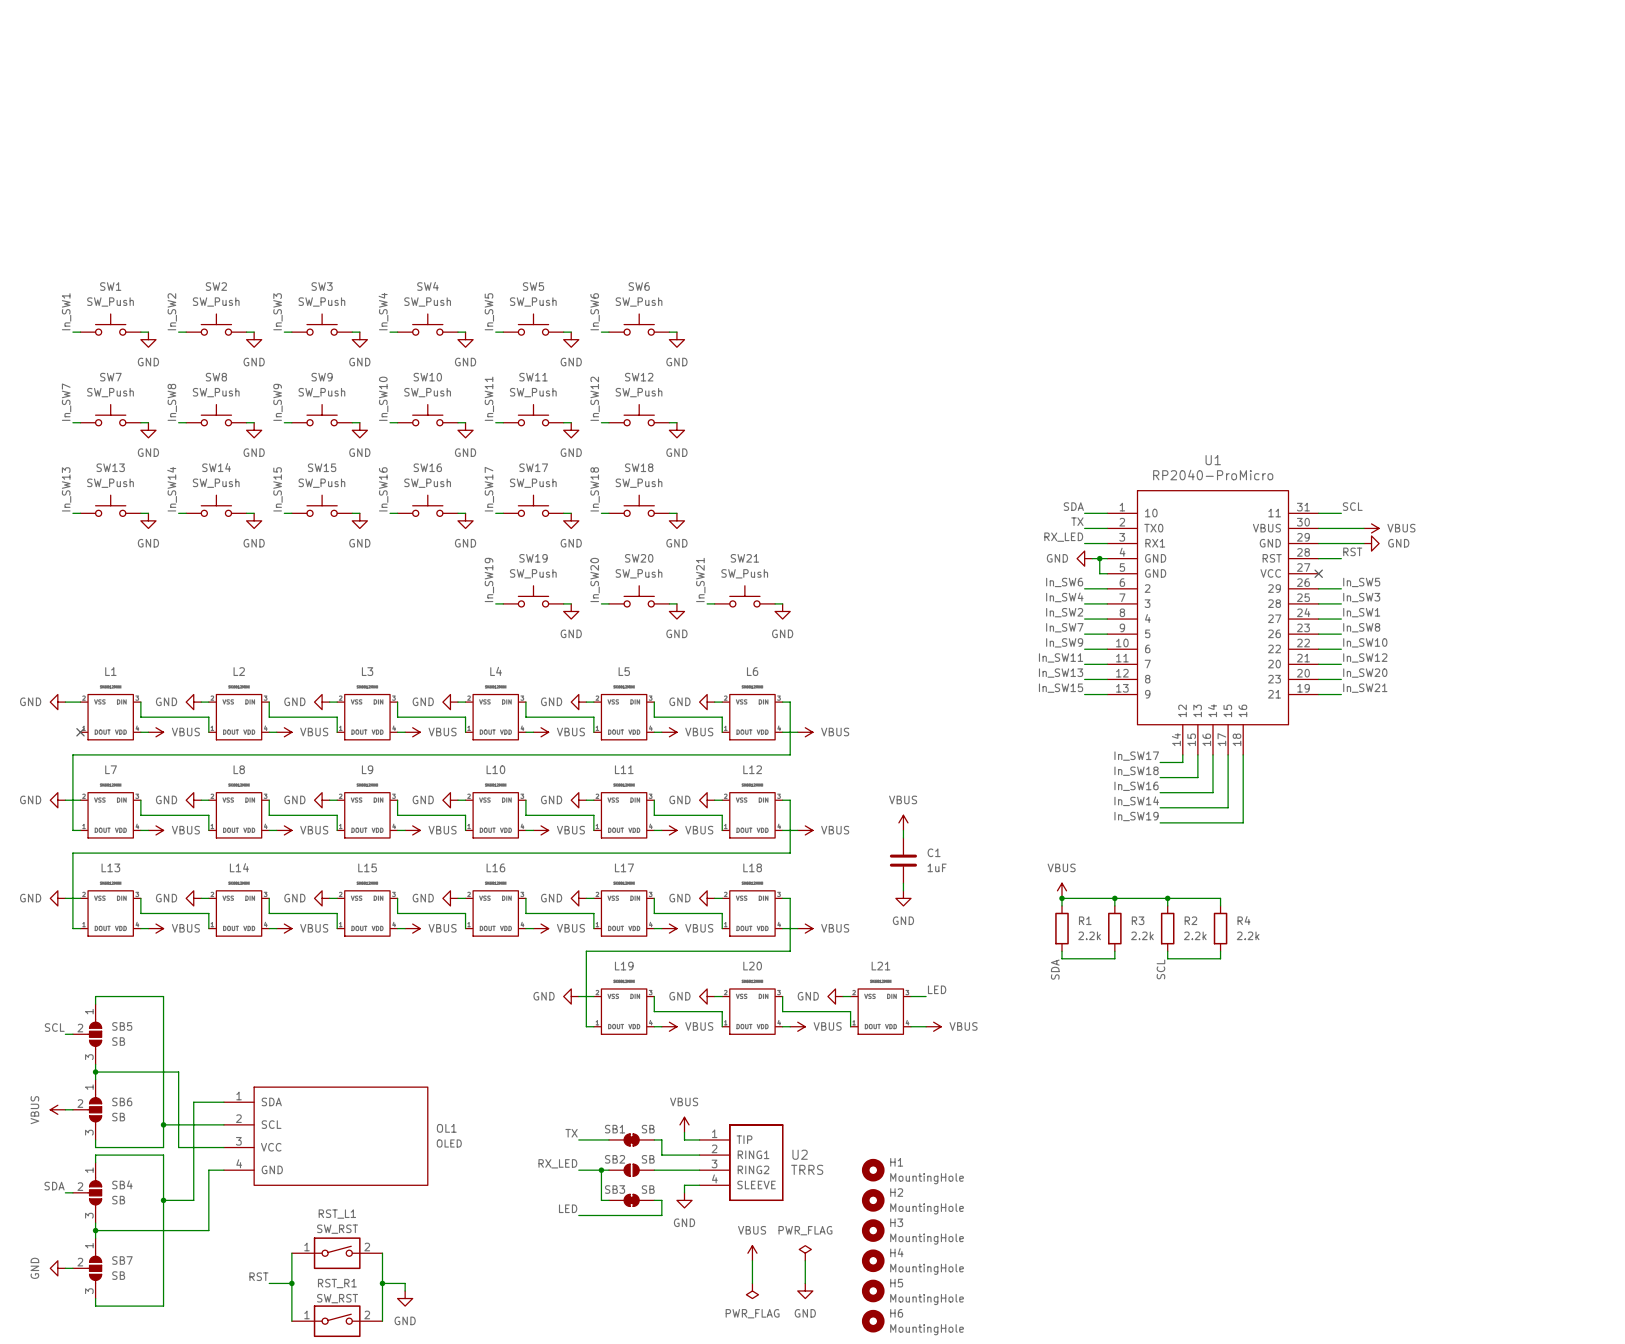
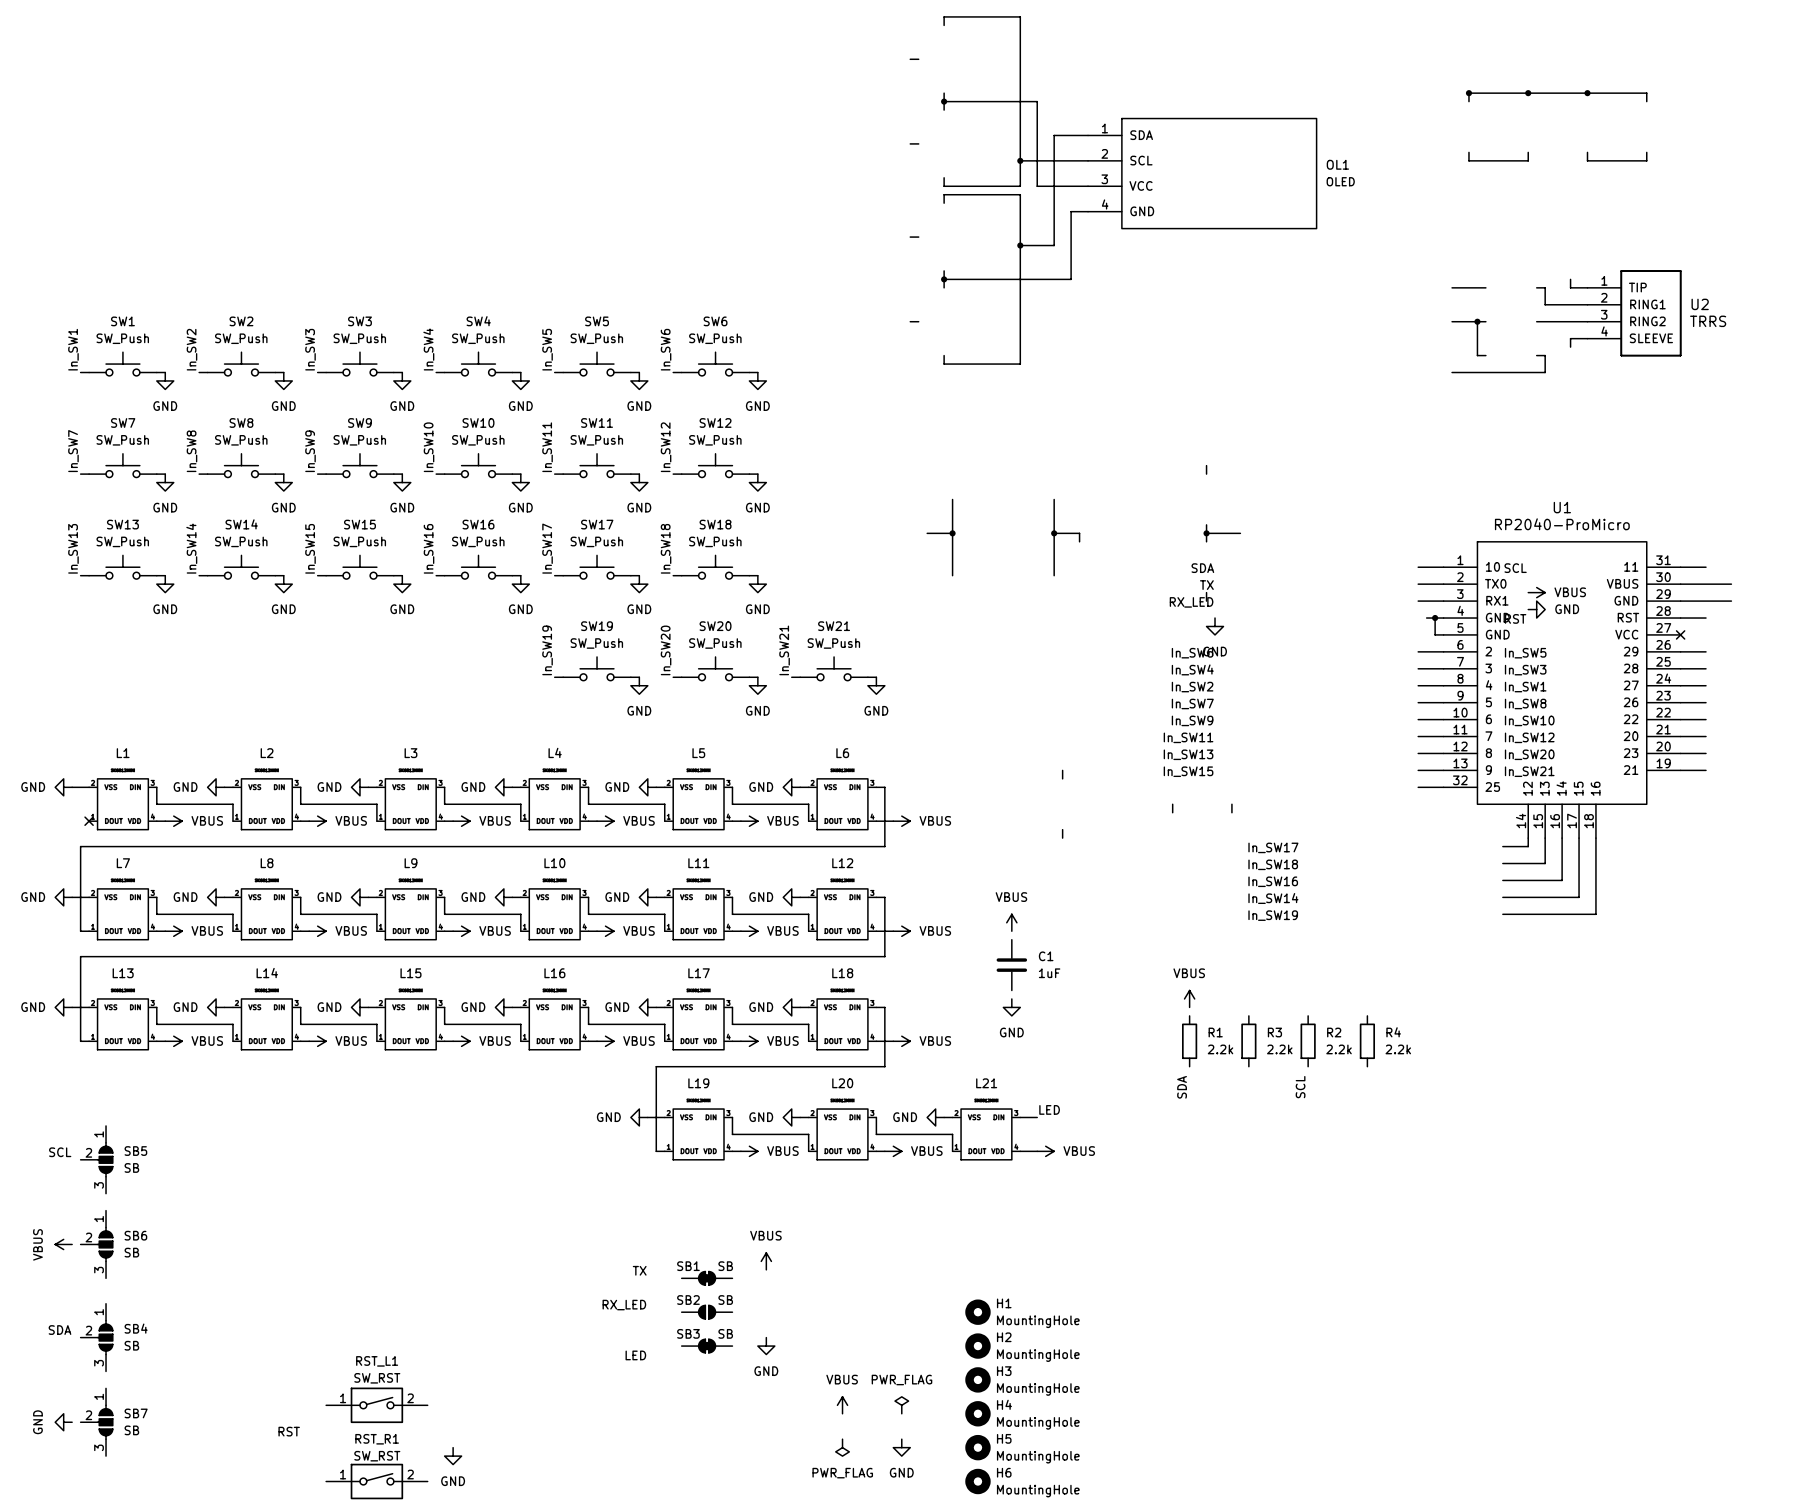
wire: none -> (944, 25) (944, 16) (1020, 16) (1020, 186) (944, 186) (944, 177)
wire: none -> (910, 59) (918, 59)
wire: none -> (944, 93) (944, 110)
junction: none -> (1468, 93)
junction: none -> (1528, 93)
junction: none -> (1587, 93)
wire: none -> (944, 101) (1037, 101) (1037, 186) (1088, 186)
junction: none -> (944, 101)
wire: none -> (1468, 101) (1468, 93) (1646, 93) (1646, 101)
wire: none -> (1088, 135) (1054, 135) (1054, 245) (1020, 245)
wire: none -> (910, 143) (918, 143)
wire: none -> (1468, 152) (1468, 160) (1528, 160) (1528, 152)
wire: none -> (1587, 152) (1587, 160) (1646, 160) (1646, 152)
wire: none -> (1020, 160) (1088, 160)
junction: none -> (1020, 160)
wire: none -> (944, 203) (944, 194) (1020, 194) (1020, 364) (944, 364) (944, 355)
wire: none -> (1088, 211) (1071, 211) (1071, 279) (944, 279)
wire: none -> (910, 237) (918, 237)
junction: none -> (1020, 245)
wire: none -> (944, 270) (944, 287)
junction: none -> (944, 279)
wire: none -> (1570, 279) (1570, 287) (1587, 287)
wire: none -> (1452, 287) (1485, 287)
wire: none -> (1536, 287) (1545, 287) (1545, 304) (1587, 304)
wire: none -> (910, 321) (918, 321)
wire: none -> (1452, 321) (1485, 321)
wire: none -> (1477, 321) (1477, 355) (1485, 355)
junction: none -> (1477, 321)
wire: none -> (1536, 321) (1587, 321)
wire: none -> (1587, 338) (1570, 338) (1570, 347)
wire: none -> (1536, 355) (1545, 355) (1545, 372) (1452, 372)
wire: none -> (1206, 465) (1206, 474)
wire: none -> (952, 499) (952, 575)
wire: none -> (1054, 499) (1054, 575)
wire: none -> (1206, 524) (1206, 541)
wire: none -> (927, 533) (952, 533)
junction: none -> (952, 533)
wire: none -> (1054, 533) (1079, 533) (1079, 541)
junction: none -> (1054, 533)
wire: none -> (1206, 533) (1240, 533)
junction: none -> (1206, 533)
U1 symbol: [1107, 490, 1319, 755] -> [1443, 541, 1681, 839]
wire: none -> (1418, 567) (1443, 567)
wire: none -> (1680, 567) (1706, 567)
wire: (1084, 513) (1107, 513) -> none
wire: (1318, 513) (1341, 513) -> (1418, 584) (1443, 584)
wire: none -> (1680, 584) (1731, 584)
wire: none -> (1206, 592) (1206, 601)
wire: (1084, 528) (1107, 528) -> none
wire: (1318, 528) (1363, 528) -> none
wire: none -> (1680, 601) (1731, 601)
wire: (1084, 543) (1107, 543) -> none
wire: (1318, 543) (1363, 543) -> none
wire: none -> (1426, 618) (1443, 618)
wire: none -> (1435, 618) (1435, 634) (1443, 634)
junction: none -> (1435, 618)
wire: none -> (1680, 618) (1706, 618)
power symbol rotation: 0° (1084, 558) -> 90° counterclockwise (1215, 626)
wire: (1092, 558) (1107, 558) -> none
wire: (1099, 558) (1099, 573) (1107, 573) -> none
junction: (1099, 558) -> none
wire: (1318, 558) (1341, 558) -> (1418, 651) (1443, 651)
no-connect mark: none -> (1680, 634)
no-connect mark: (1318, 573) -> none
wire: none -> (1680, 651) (1706, 651)
wire: (1084, 588) (1107, 588) -> none
wire: (1318, 588) (1341, 588) -> (1418, 668) (1443, 668)
wire: none -> (1680, 668) (1706, 668)
wire: (1084, 603) (1107, 603) -> none
wire: (1318, 603) (1341, 603) -> (1418, 601) (1443, 601)
wire: none -> (1680, 685) (1706, 685)
wire: (1084, 619) (1107, 619) -> none
wire: (1318, 619) (1341, 619) -> (1418, 685) (1443, 685)
wire: none -> (1680, 702) (1706, 702)
wire: (1084, 634) (1107, 634) -> none
wire: (1318, 634) (1341, 634) -> (1418, 702) (1443, 702)
wire: none -> (1680, 719) (1706, 719)
wire: (1084, 649) (1107, 649) -> none
wire: (1318, 649) (1341, 649) -> (1418, 719) (1443, 719)
wire: none -> (1680, 736) (1706, 736)
wire: (1084, 664) (1107, 664) -> none
wire: (1318, 664) (1341, 664) -> (1418, 736) (1443, 736)
wire: none -> (1680, 753) (1706, 753)
wire: (1084, 679) (1107, 679) -> none
wire: (1318, 679) (1341, 679) -> (1418, 753) (1443, 753)
wire: none -> (1062, 770) (1062, 778)
wire: none -> (1418, 770) (1443, 770)
wire: none -> (1680, 770) (1706, 770)
wire: (1084, 694) (1107, 694) -> none
wire: (1318, 694) (1341, 694) -> (1418, 787) (1443, 787)
wire: none -> (1172, 804) (1172, 812)
wire: none -> (1231, 804) (1231, 812)
wire: none -> (1528, 838) (1528, 846) (1502, 846)
wire: none -> (1545, 838) (1545, 863) (1502, 863)
wire: none -> (1562, 838) (1562, 880) (1502, 880)
wire: none -> (1579, 838) (1579, 897) (1502, 897)
wire: none -> (1595, 838) (1595, 914) (1502, 914)
wire: (1182, 754) (1182, 762) (1160, 762) -> none
wire: (1197, 754) (1197, 777) (1160, 777) -> none
wire: (1212, 754) (1212, 792) (1160, 792) -> none
wire: (1228, 754) (1228, 807) (1160, 807) -> none
wire: (1243, 754) (1243, 822) (1160, 822) -> none
wire: (903, 830) (903, 837) -> (1062, 829) (1062, 838)
wire: (903, 883) (903, 890) -> none
junction: (1061, 898) -> none
wire: (1114, 898) (1114, 905) -> none
junction: (1114, 898) -> none
wire: (1167, 898) (1167, 905) -> none
junction: (1167, 898) -> none
wire: (1061, 905) (1061, 898) (1220, 898) (1220, 905) -> none
wire: (1061, 951) (1061, 958) (1114, 958) (1114, 951) -> none
wire: (1167, 951) (1167, 958) (1220, 958) (1220, 951) -> none
wire: (95, 1004) (95, 996) (163, 996) (163, 1147) (95, 1147) (95, 1139) -> none
wire: (65, 1034) (72, 1034) -> none
wire: (95, 1064) (95, 1079) -> none
wire: (95, 1072) (178, 1072) (178, 1147) (223, 1147) -> none
junction: (95, 1072) -> none
wire: (223, 1102) (193, 1102) (193, 1200) (163, 1200) -> none
wire: (65, 1109) (72, 1109) -> none
wire: (163, 1124) (223, 1124) -> none
junction: (163, 1124) -> none
wire: (684, 1132) (684, 1139) (699, 1139) -> none
OL1 position: (325, 1136) -> (1202, 173)
wire: (578, 1139) (608, 1139) -> none
wire: (654, 1139) (661, 1139) (661, 1155) (699, 1155) -> none
wire: (95, 1162) (95, 1155) (163, 1155) (163, 1306) (95, 1306) (95, 1298) -> none
U2 position: (741, 1162) -> (1634, 313)
wire: (223, 1170) (208, 1170) (208, 1230) (95, 1230) -> none
wire: (578, 1170) (608, 1170) -> none
wire: (601, 1170) (601, 1200) (608, 1200) -> none
junction: (601, 1170) -> none
wire: (654, 1170) (699, 1170) -> none
wire: (699, 1185) (684, 1185) (684, 1192) -> none
wire: (65, 1192) (72, 1192) -> none
junction: (163, 1200) -> none
wire: (654, 1200) (661, 1200) (661, 1215) (578, 1215) -> none
wire: (95, 1223) (95, 1238) -> none
junction: (95, 1230) -> none
wire: (291, 1253) (291, 1321) -> none
wire: (382, 1253) (382, 1321) -> none
wire: (752, 1260) (752, 1283) -> none
wire: (805, 1260) (805, 1283) -> none
wire: (65, 1268) (72, 1268) -> none
wire: (269, 1283) (291, 1283) -> none
junction: (291, 1283) -> none
wire: (382, 1283) (405, 1283) (405, 1290) -> none
junction: (382, 1283) -> none

